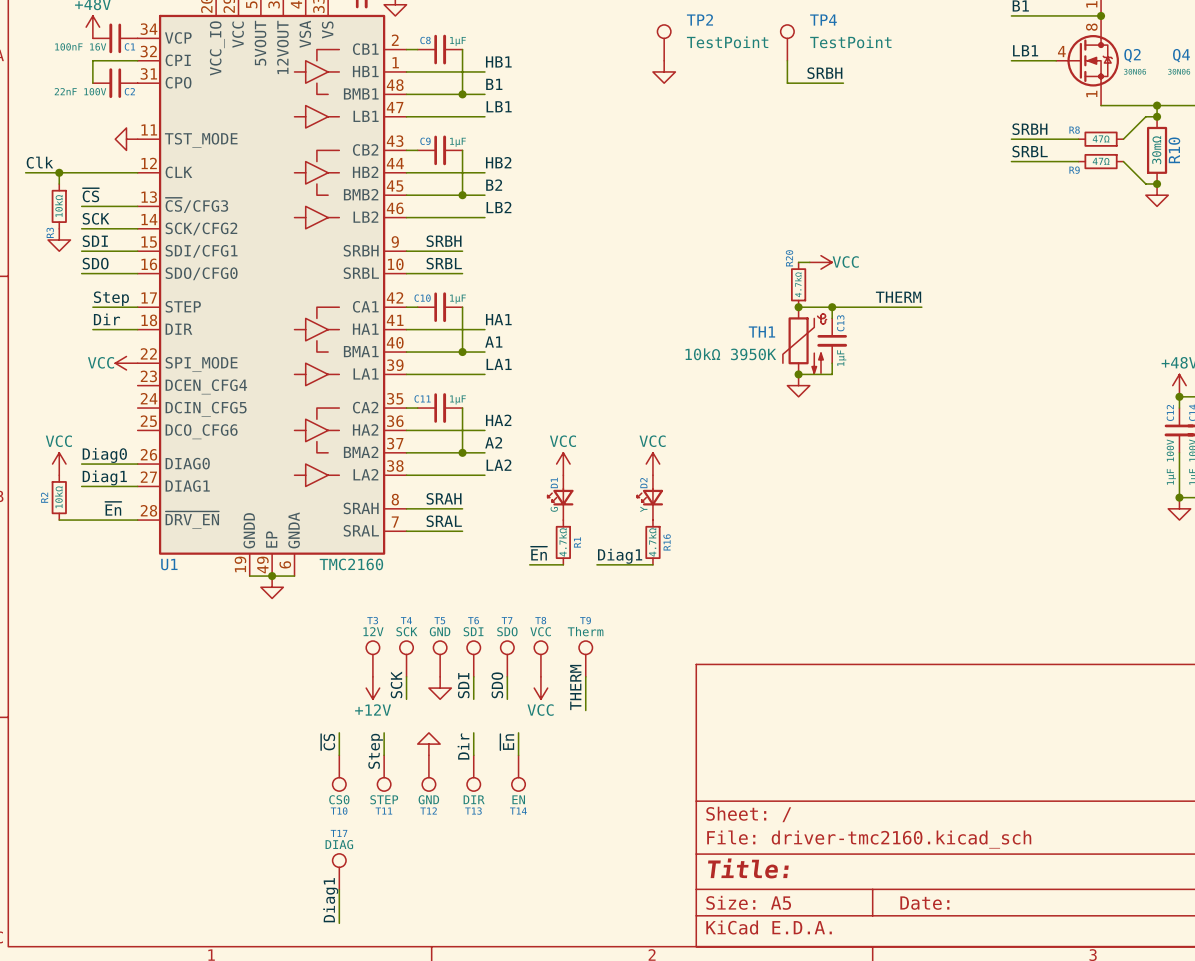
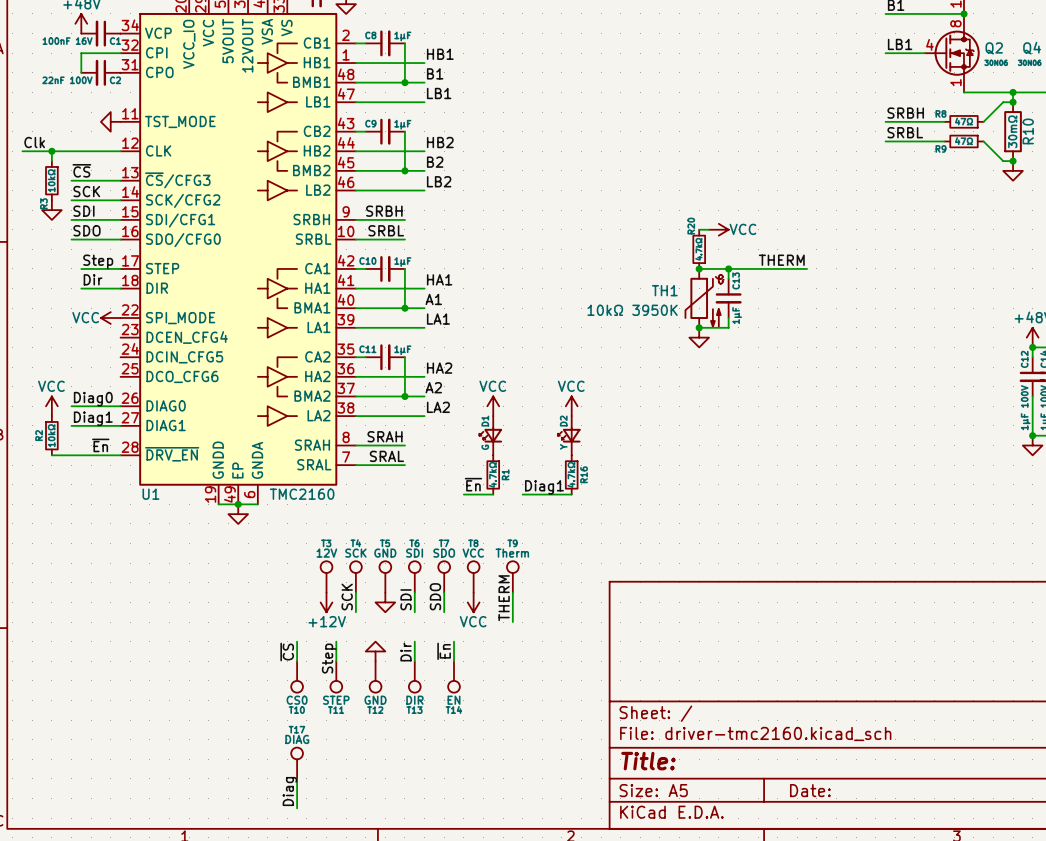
TP2: TestPoint (664, 42) -> none
TP4: TestPoint (787, 42) -> none
wire: (787, 60) (787, 83) (843, 83) -> none
power symbol: (664, 71) -> none
label: SRBH (824, 73) -> none
label: Diag1 (330, 900) -> Diag (289, 791)

